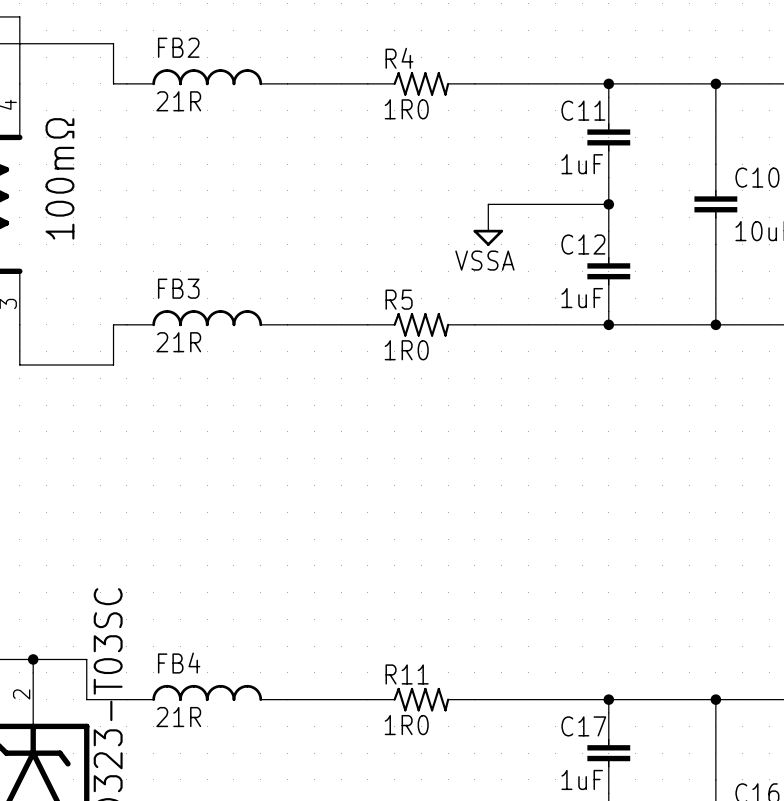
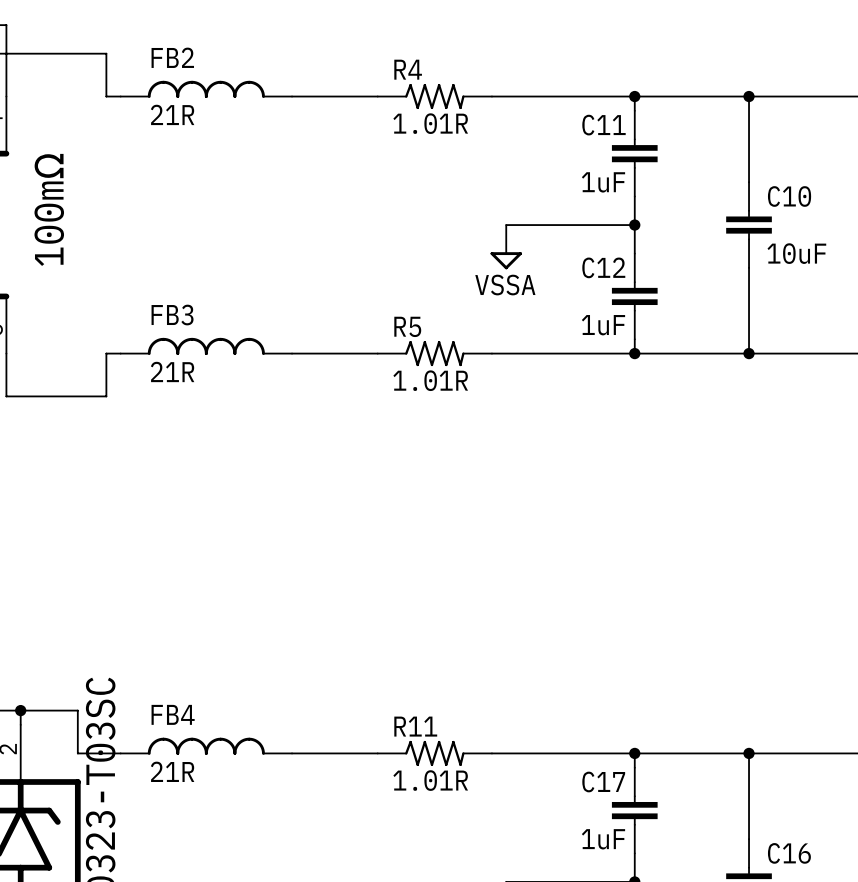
R4 value: 1R0 (406, 109) -> 1.01R (430, 123)
R5 value: 1R0 (406, 350) -> 1.01R (430, 380)
R11 value: 1R0 (406, 725) -> 1.01R (430, 780)

